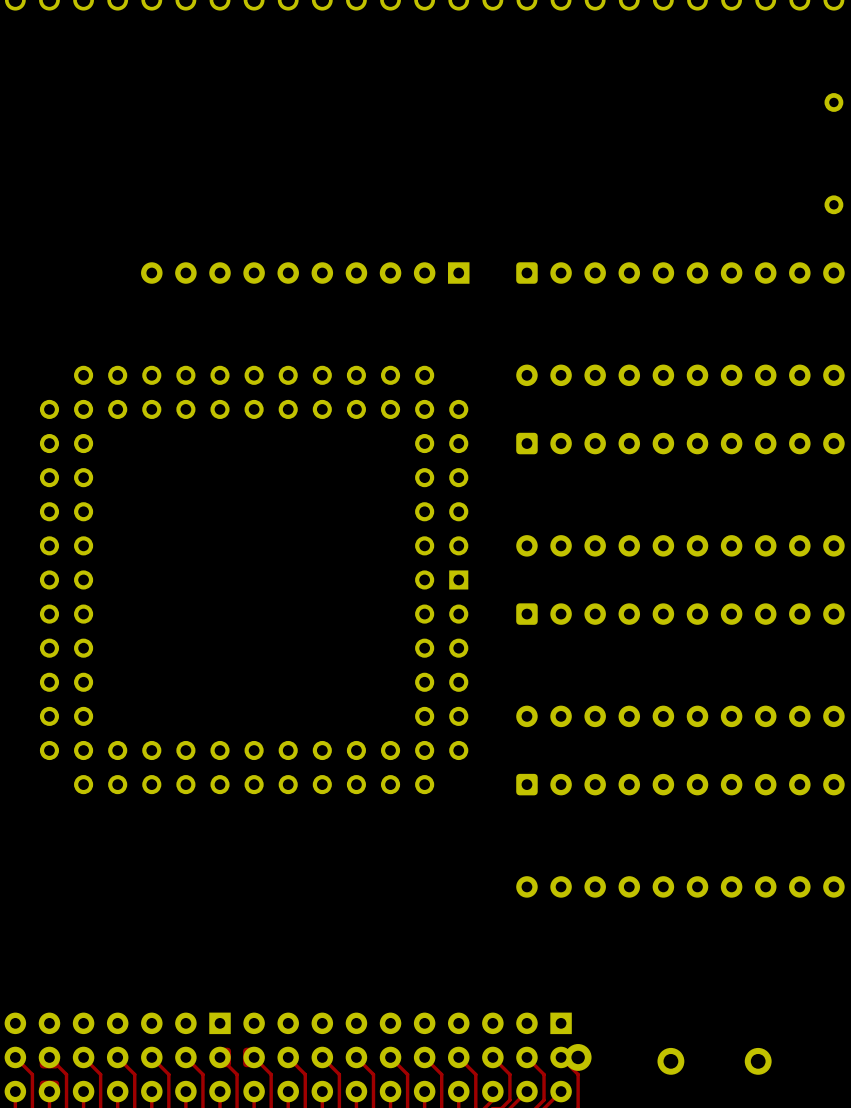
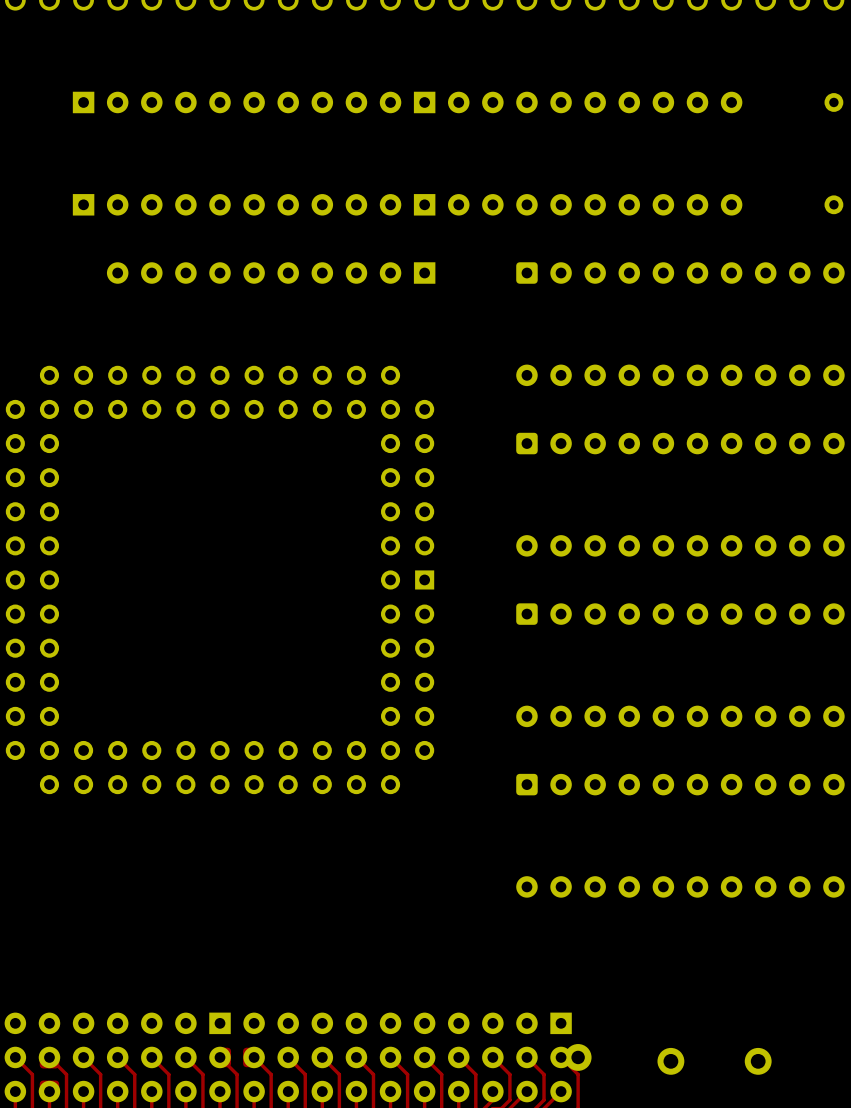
part: none -> (237, 102)
part: none -> (578, 102)
part: none -> (237, 204)
part: none -> (578, 204)
part position: (305, 273) -> (271, 273)
part position: (254, 579) -> (220, 579)

